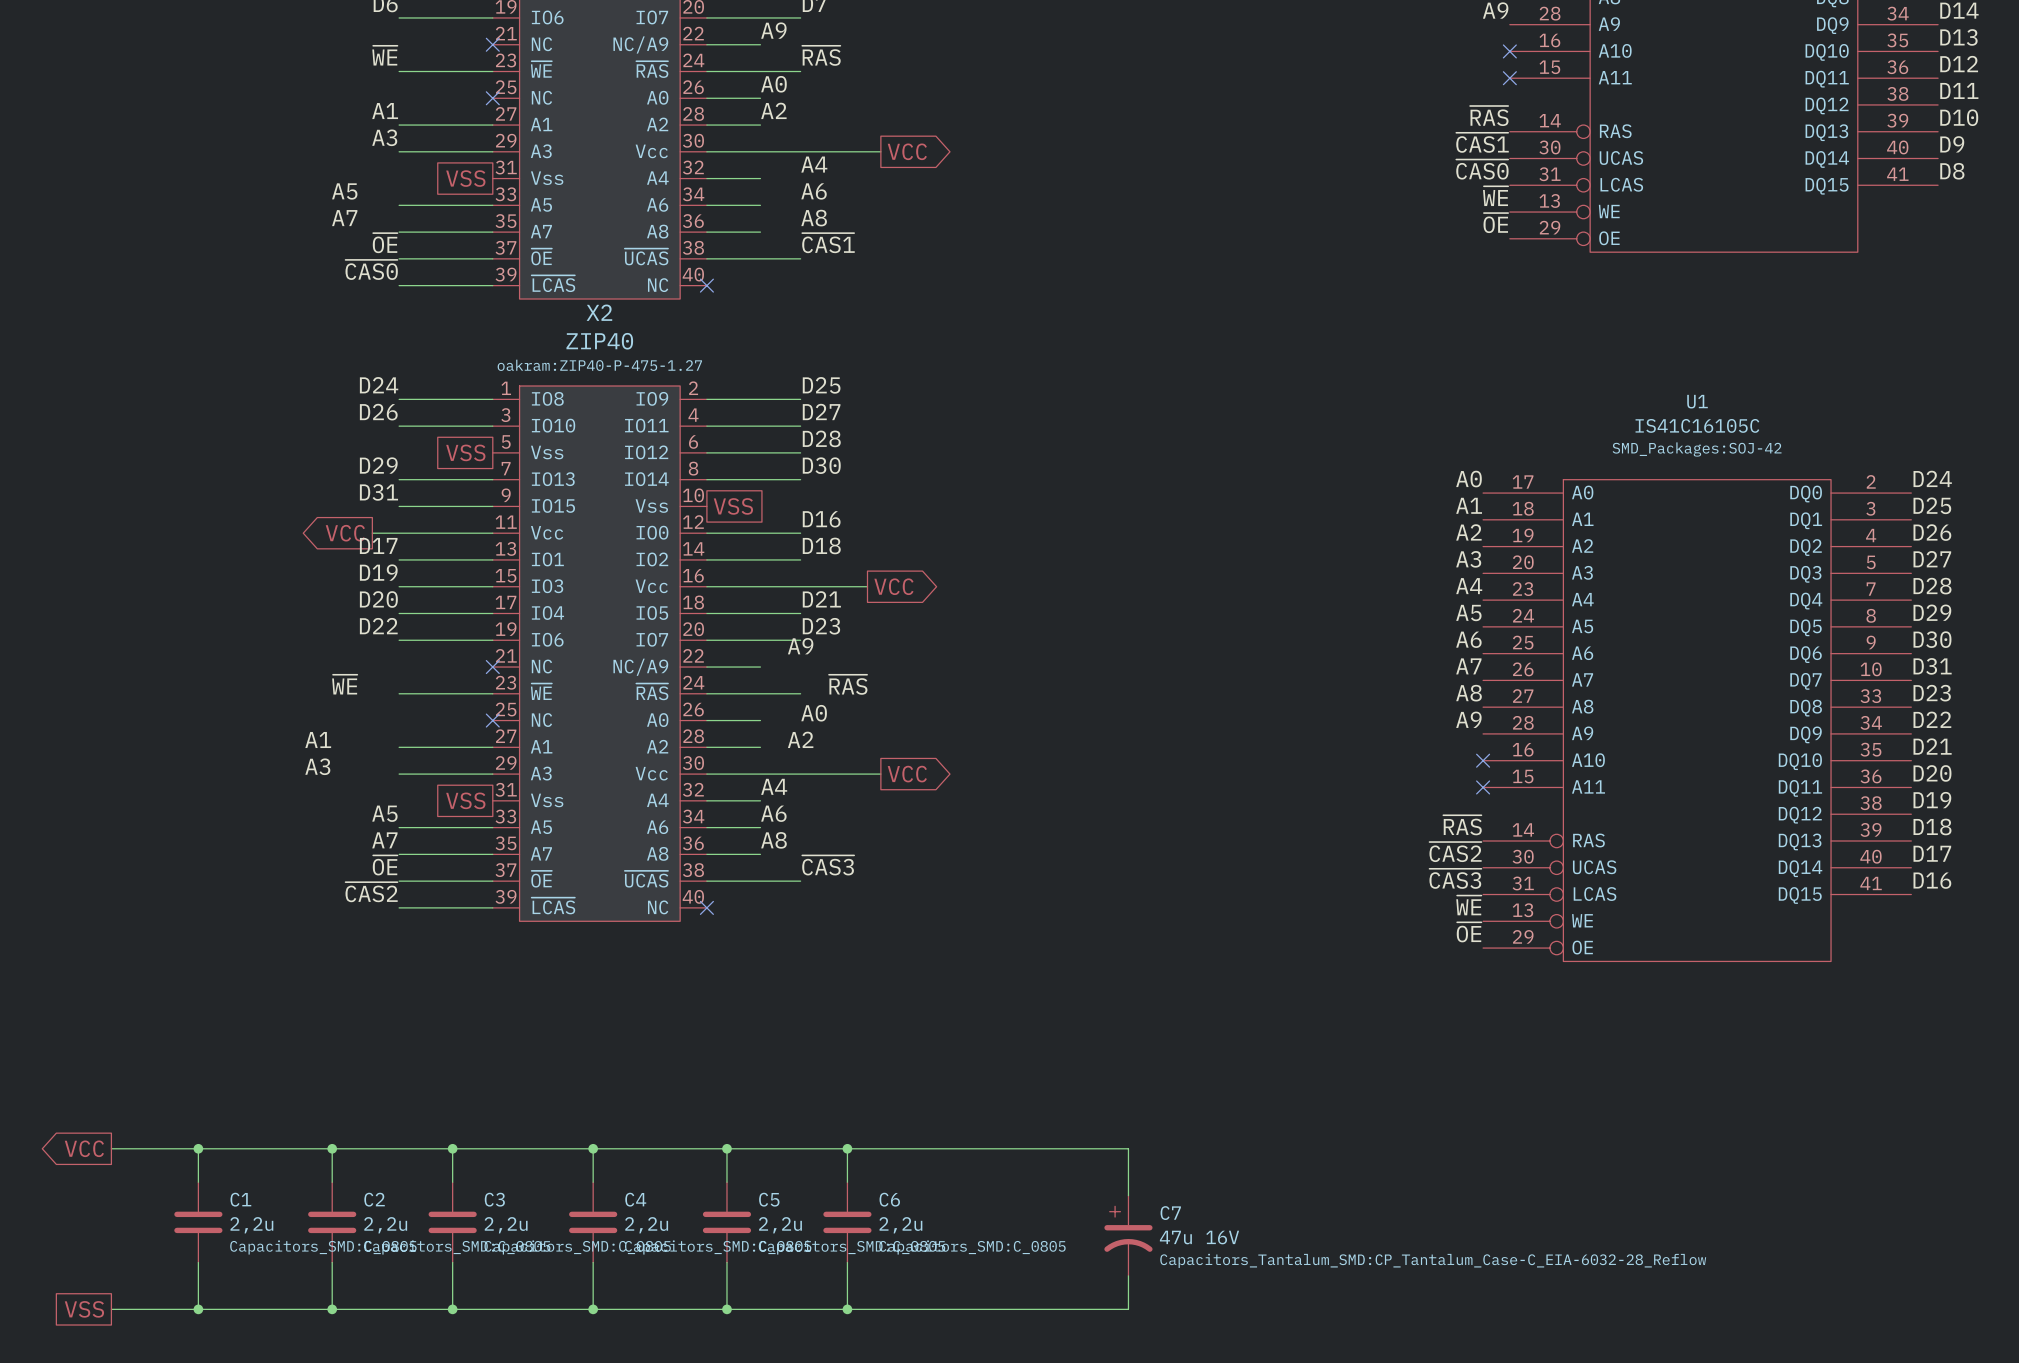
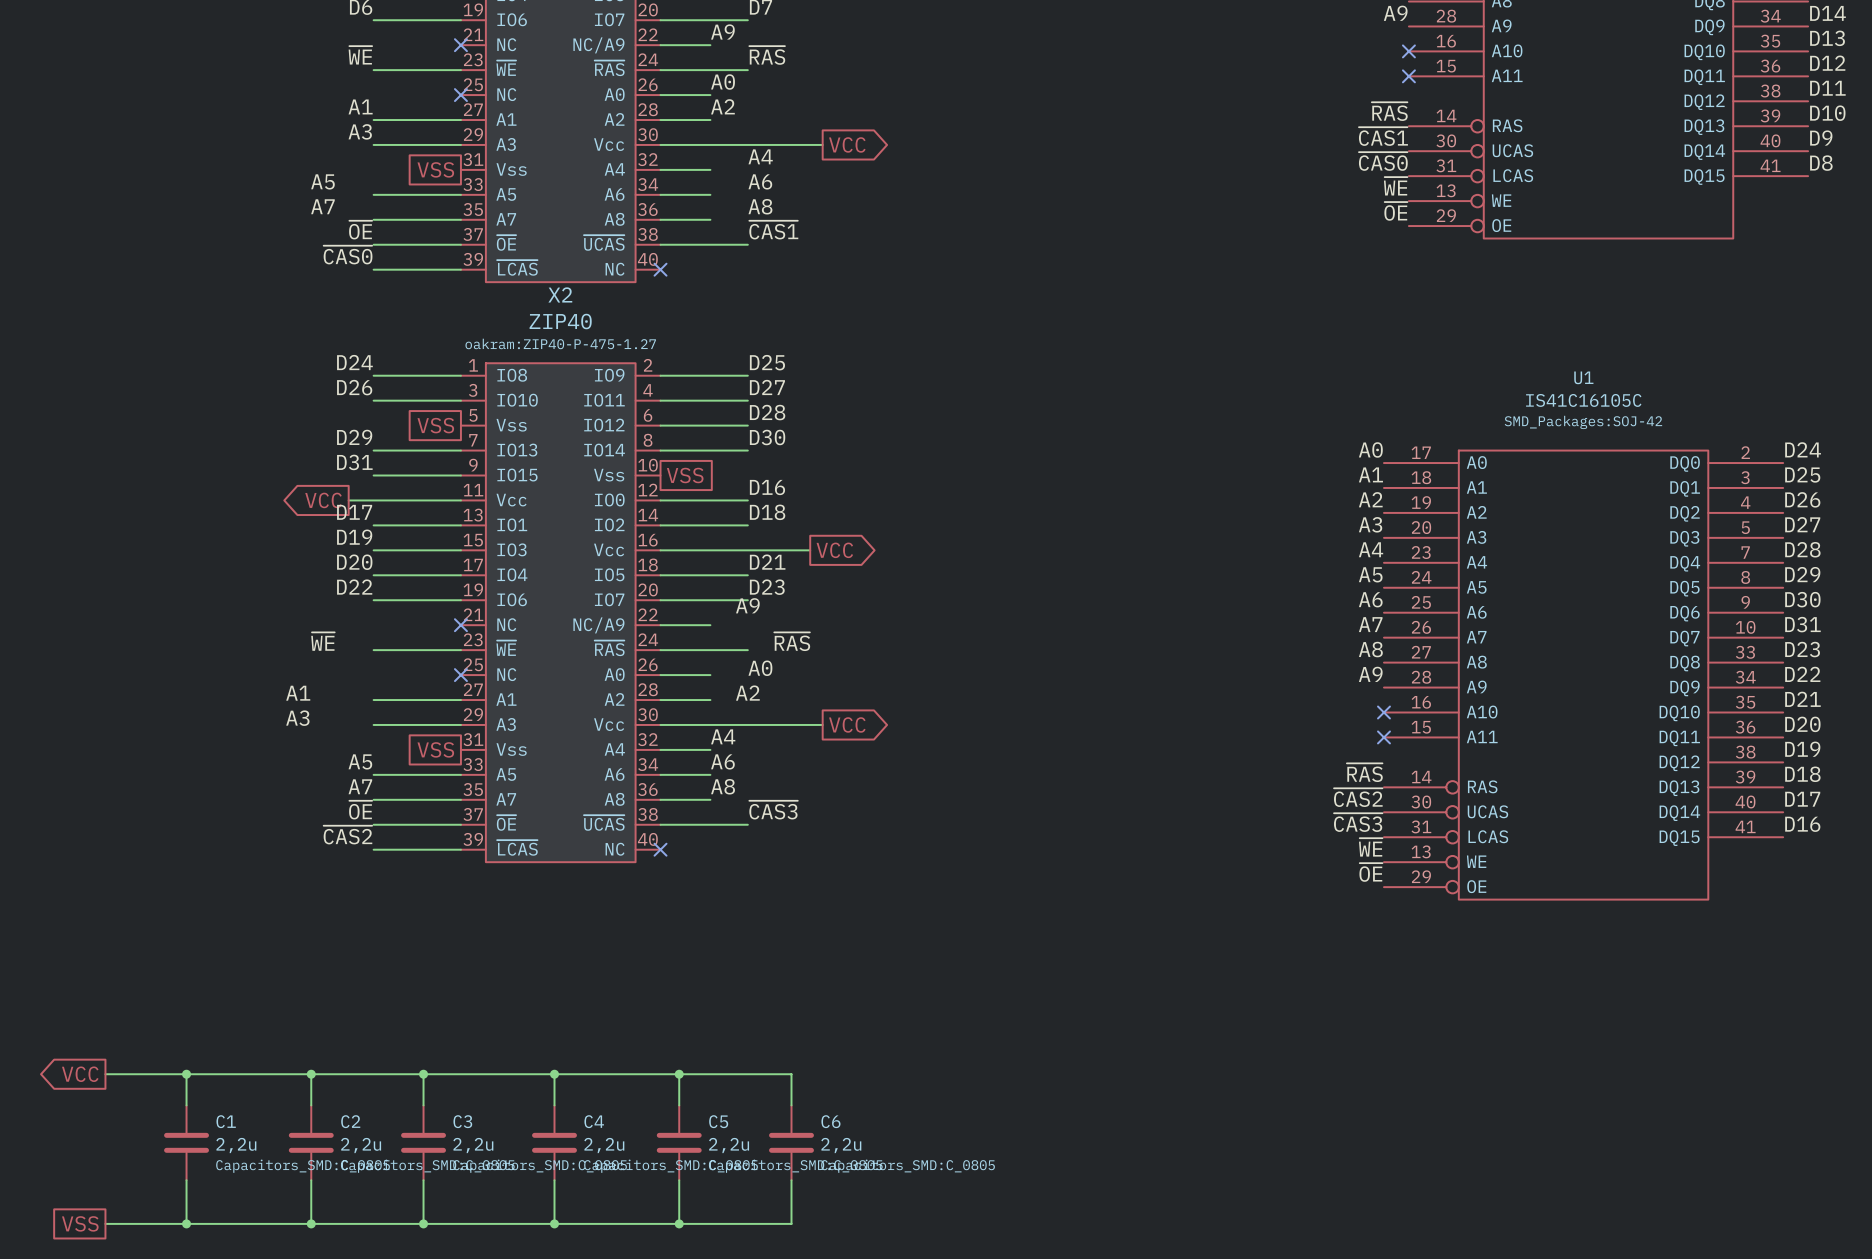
wire: (847, 1148) (1128, 1148) (1128, 1195) -> none
junction: (847, 1148) -> none
C7: 47u 16V (1128, 1235) -> none
wire: (1128, 1275) (1128, 1309) (847, 1309) -> none
junction: (847, 1309) -> none

